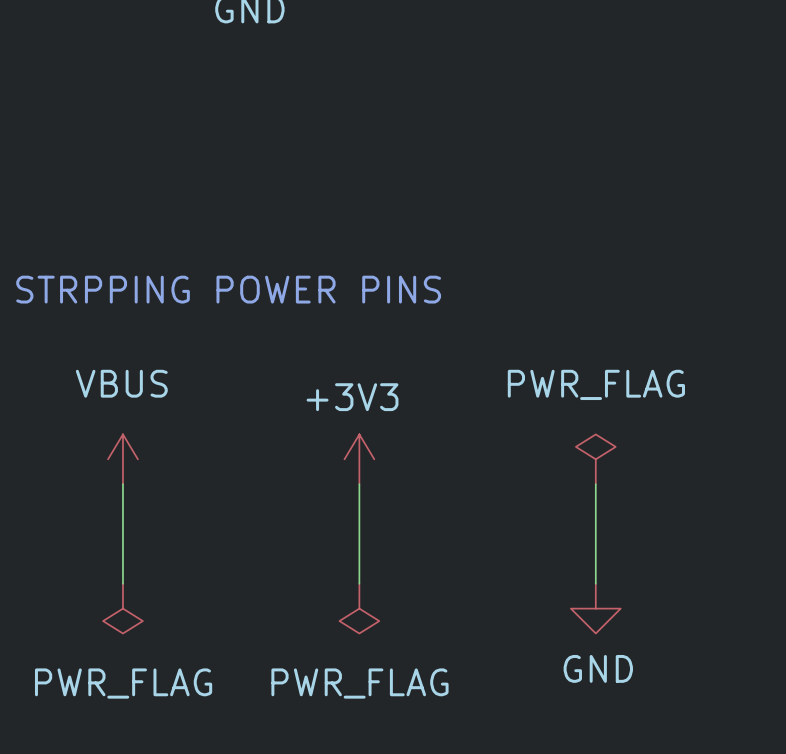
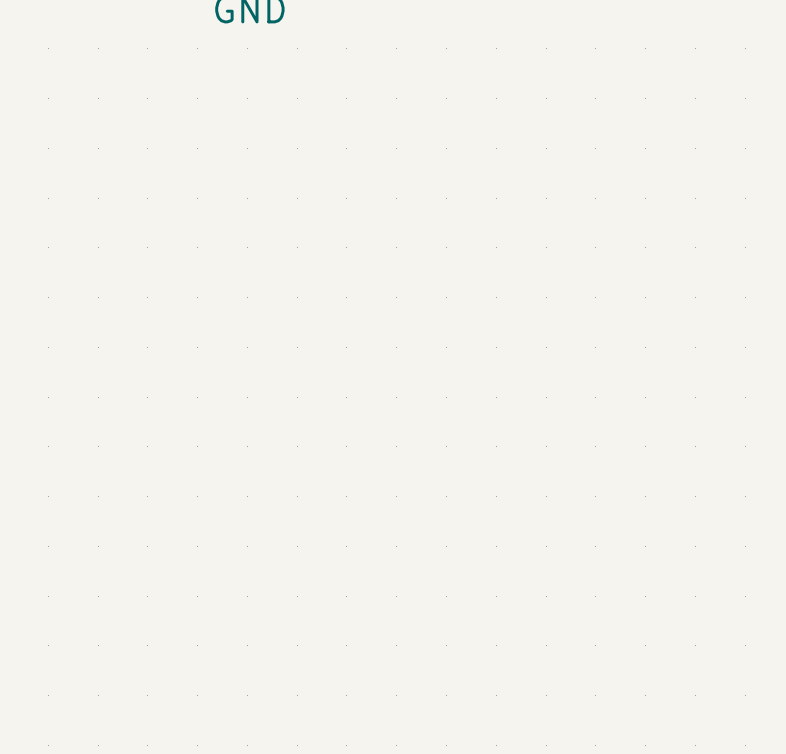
text: STRPPING POWER PINS (228, 289) -> none
power symbol: VBUS (122, 459) -> none
power symbol: +3V3 (359, 459) -> none
power symbol: PWR_FLAG (595, 459) -> none
wire: (122, 484) (122, 583) -> none
wire: (359, 484) (359, 583) -> none
wire: (595, 484) (595, 583) -> none
power symbol: PWR_FLAG (122, 608) -> none
power symbol: PWR_FLAG (359, 608) -> none
power symbol: GND (595, 608) -> none

